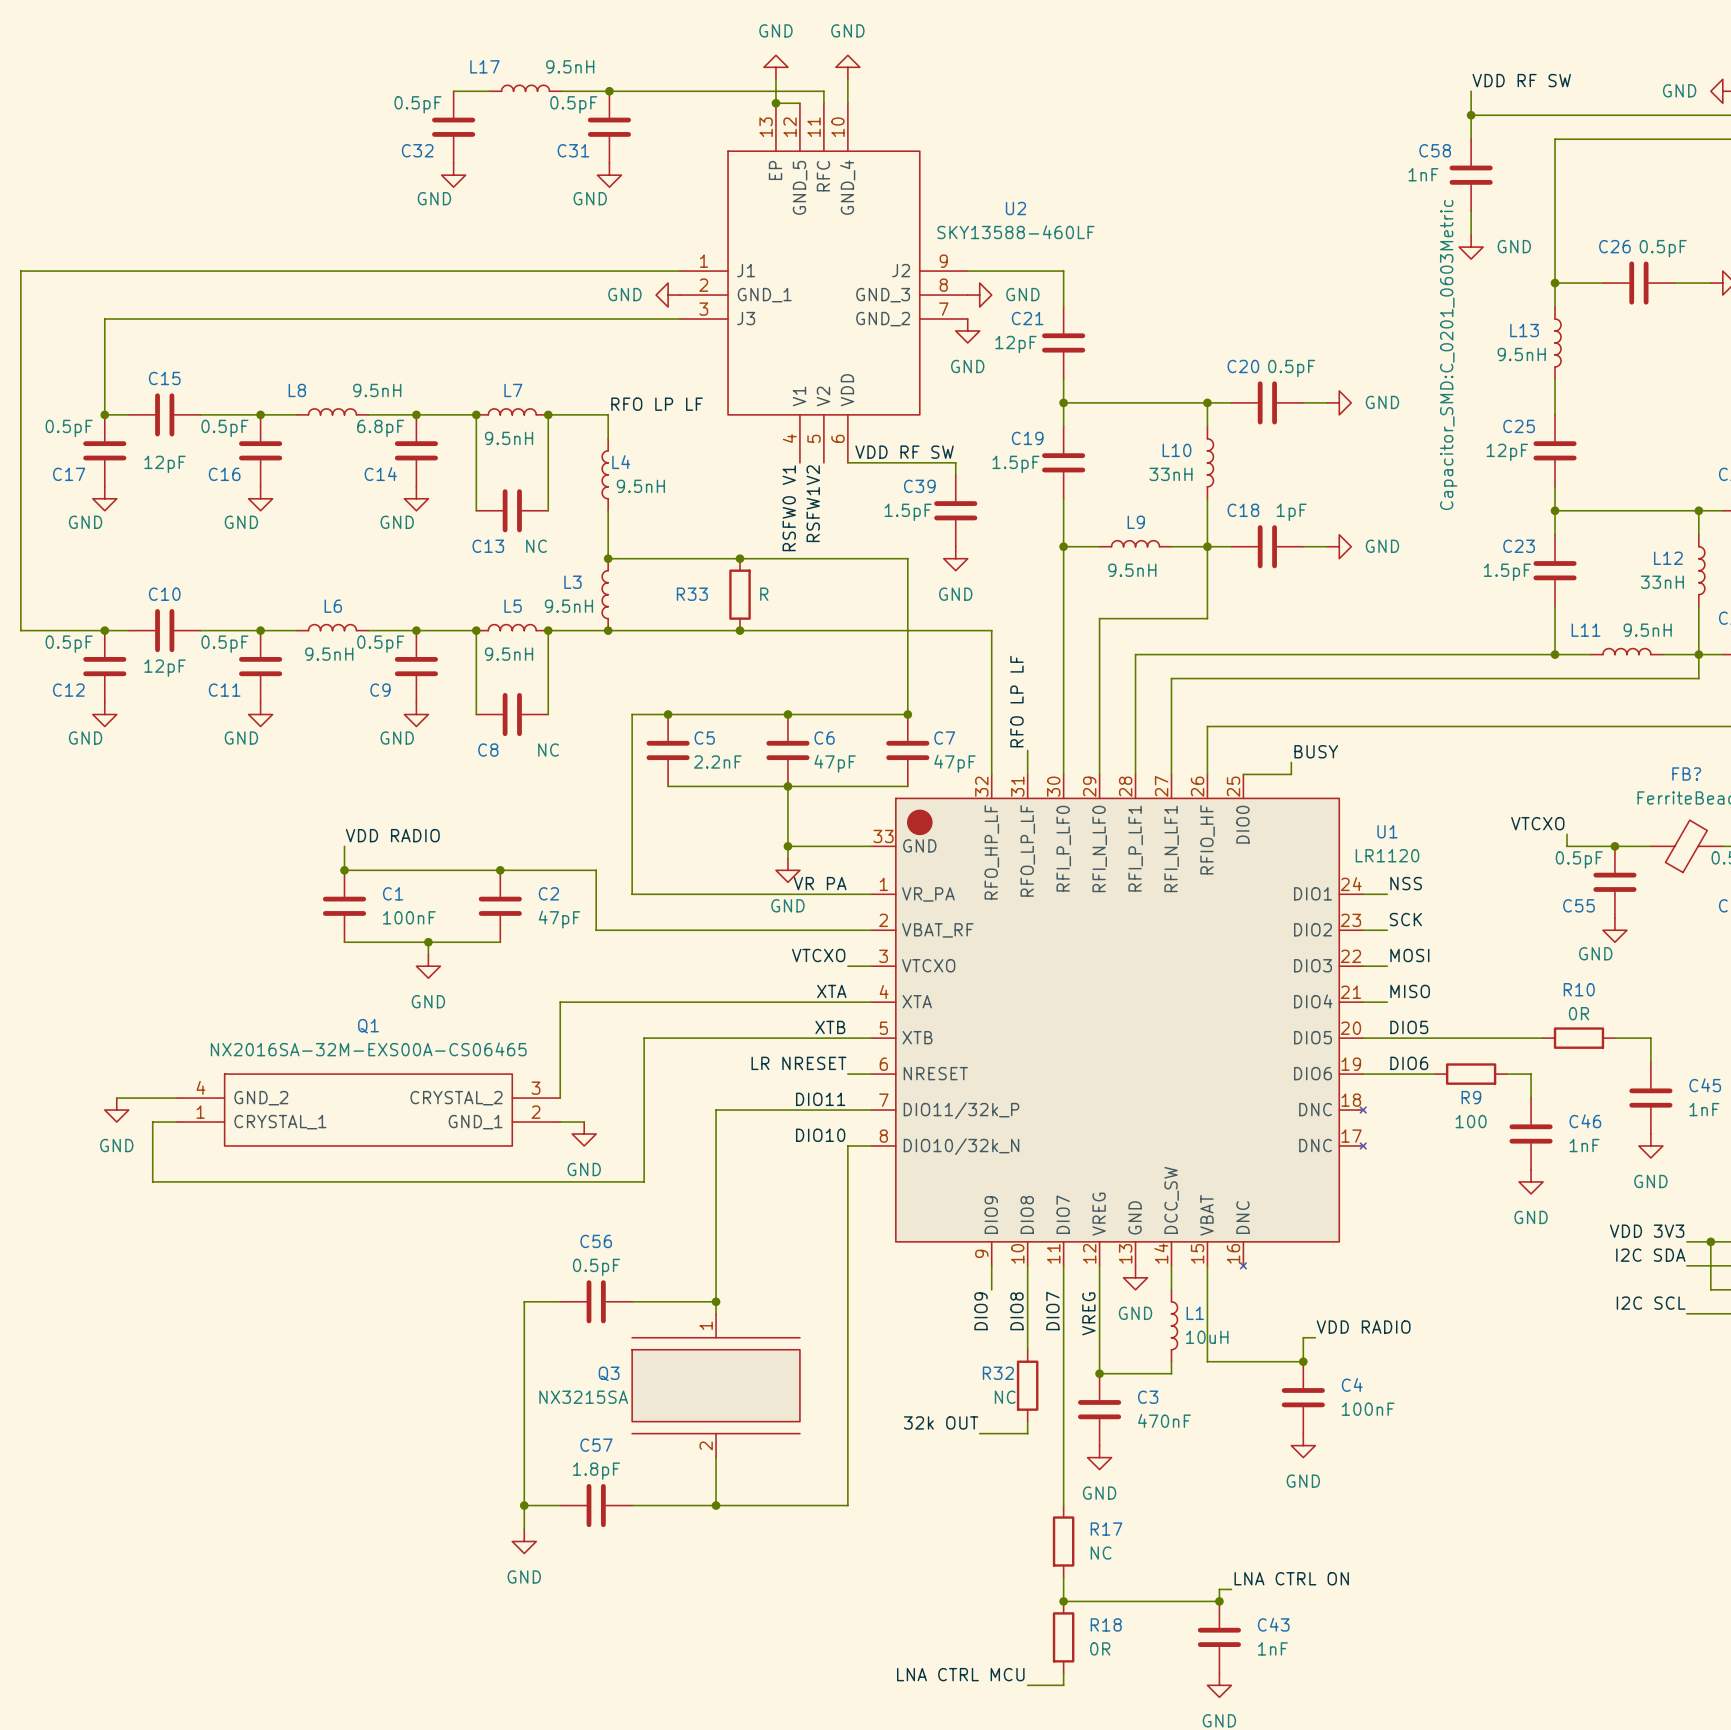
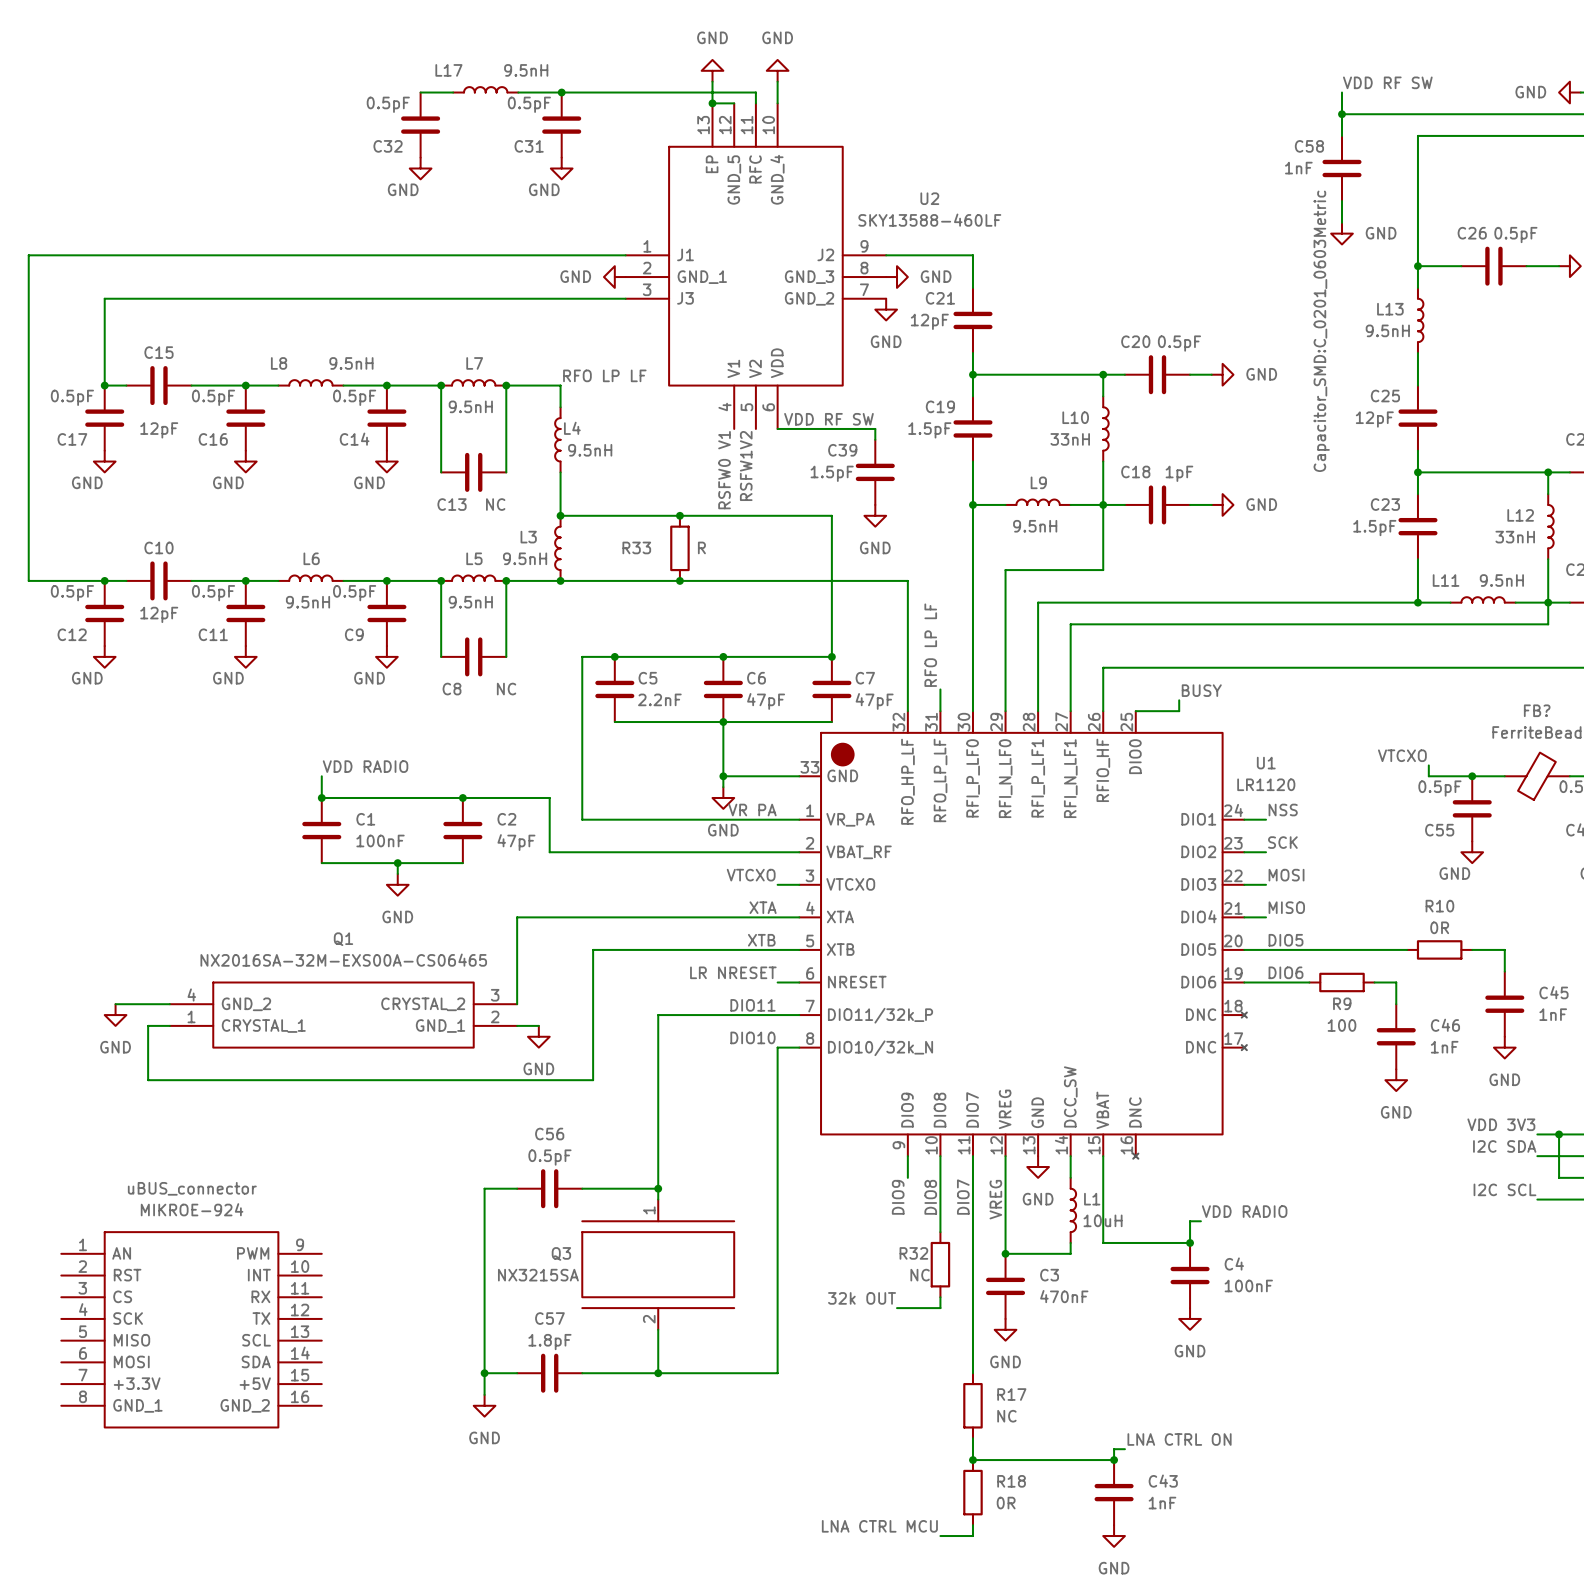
C14 value: 6.8pF (380, 428) -> 0.5pF (354, 397)
uBUS_connector: none -> MIKROE-924 (191, 1329)

